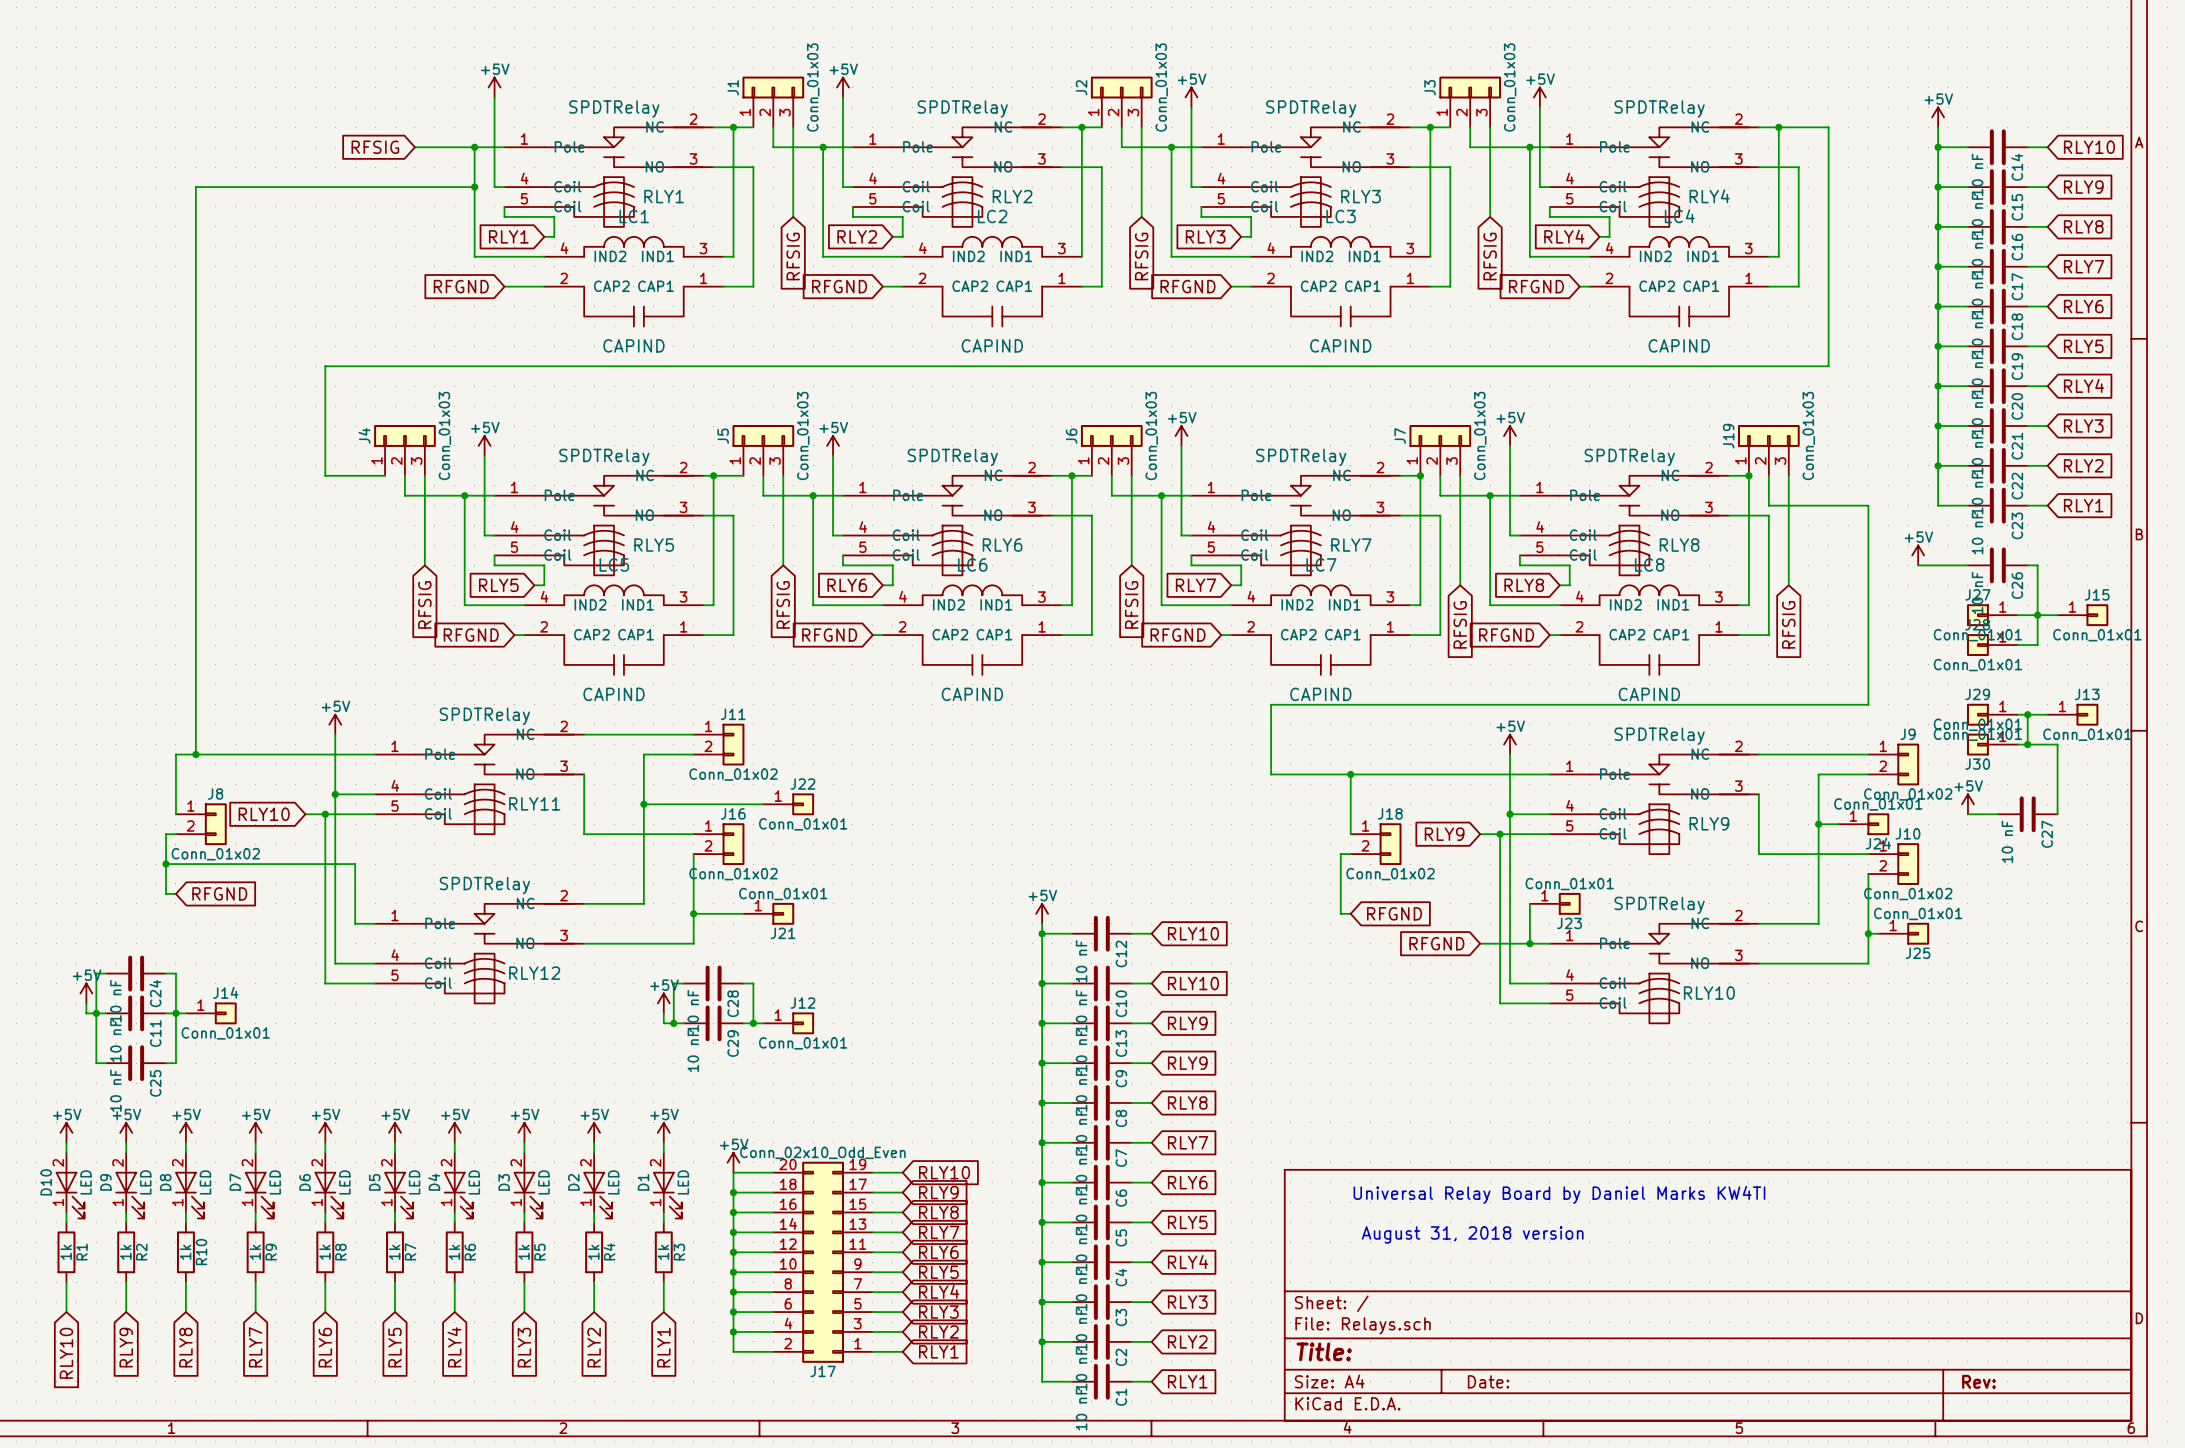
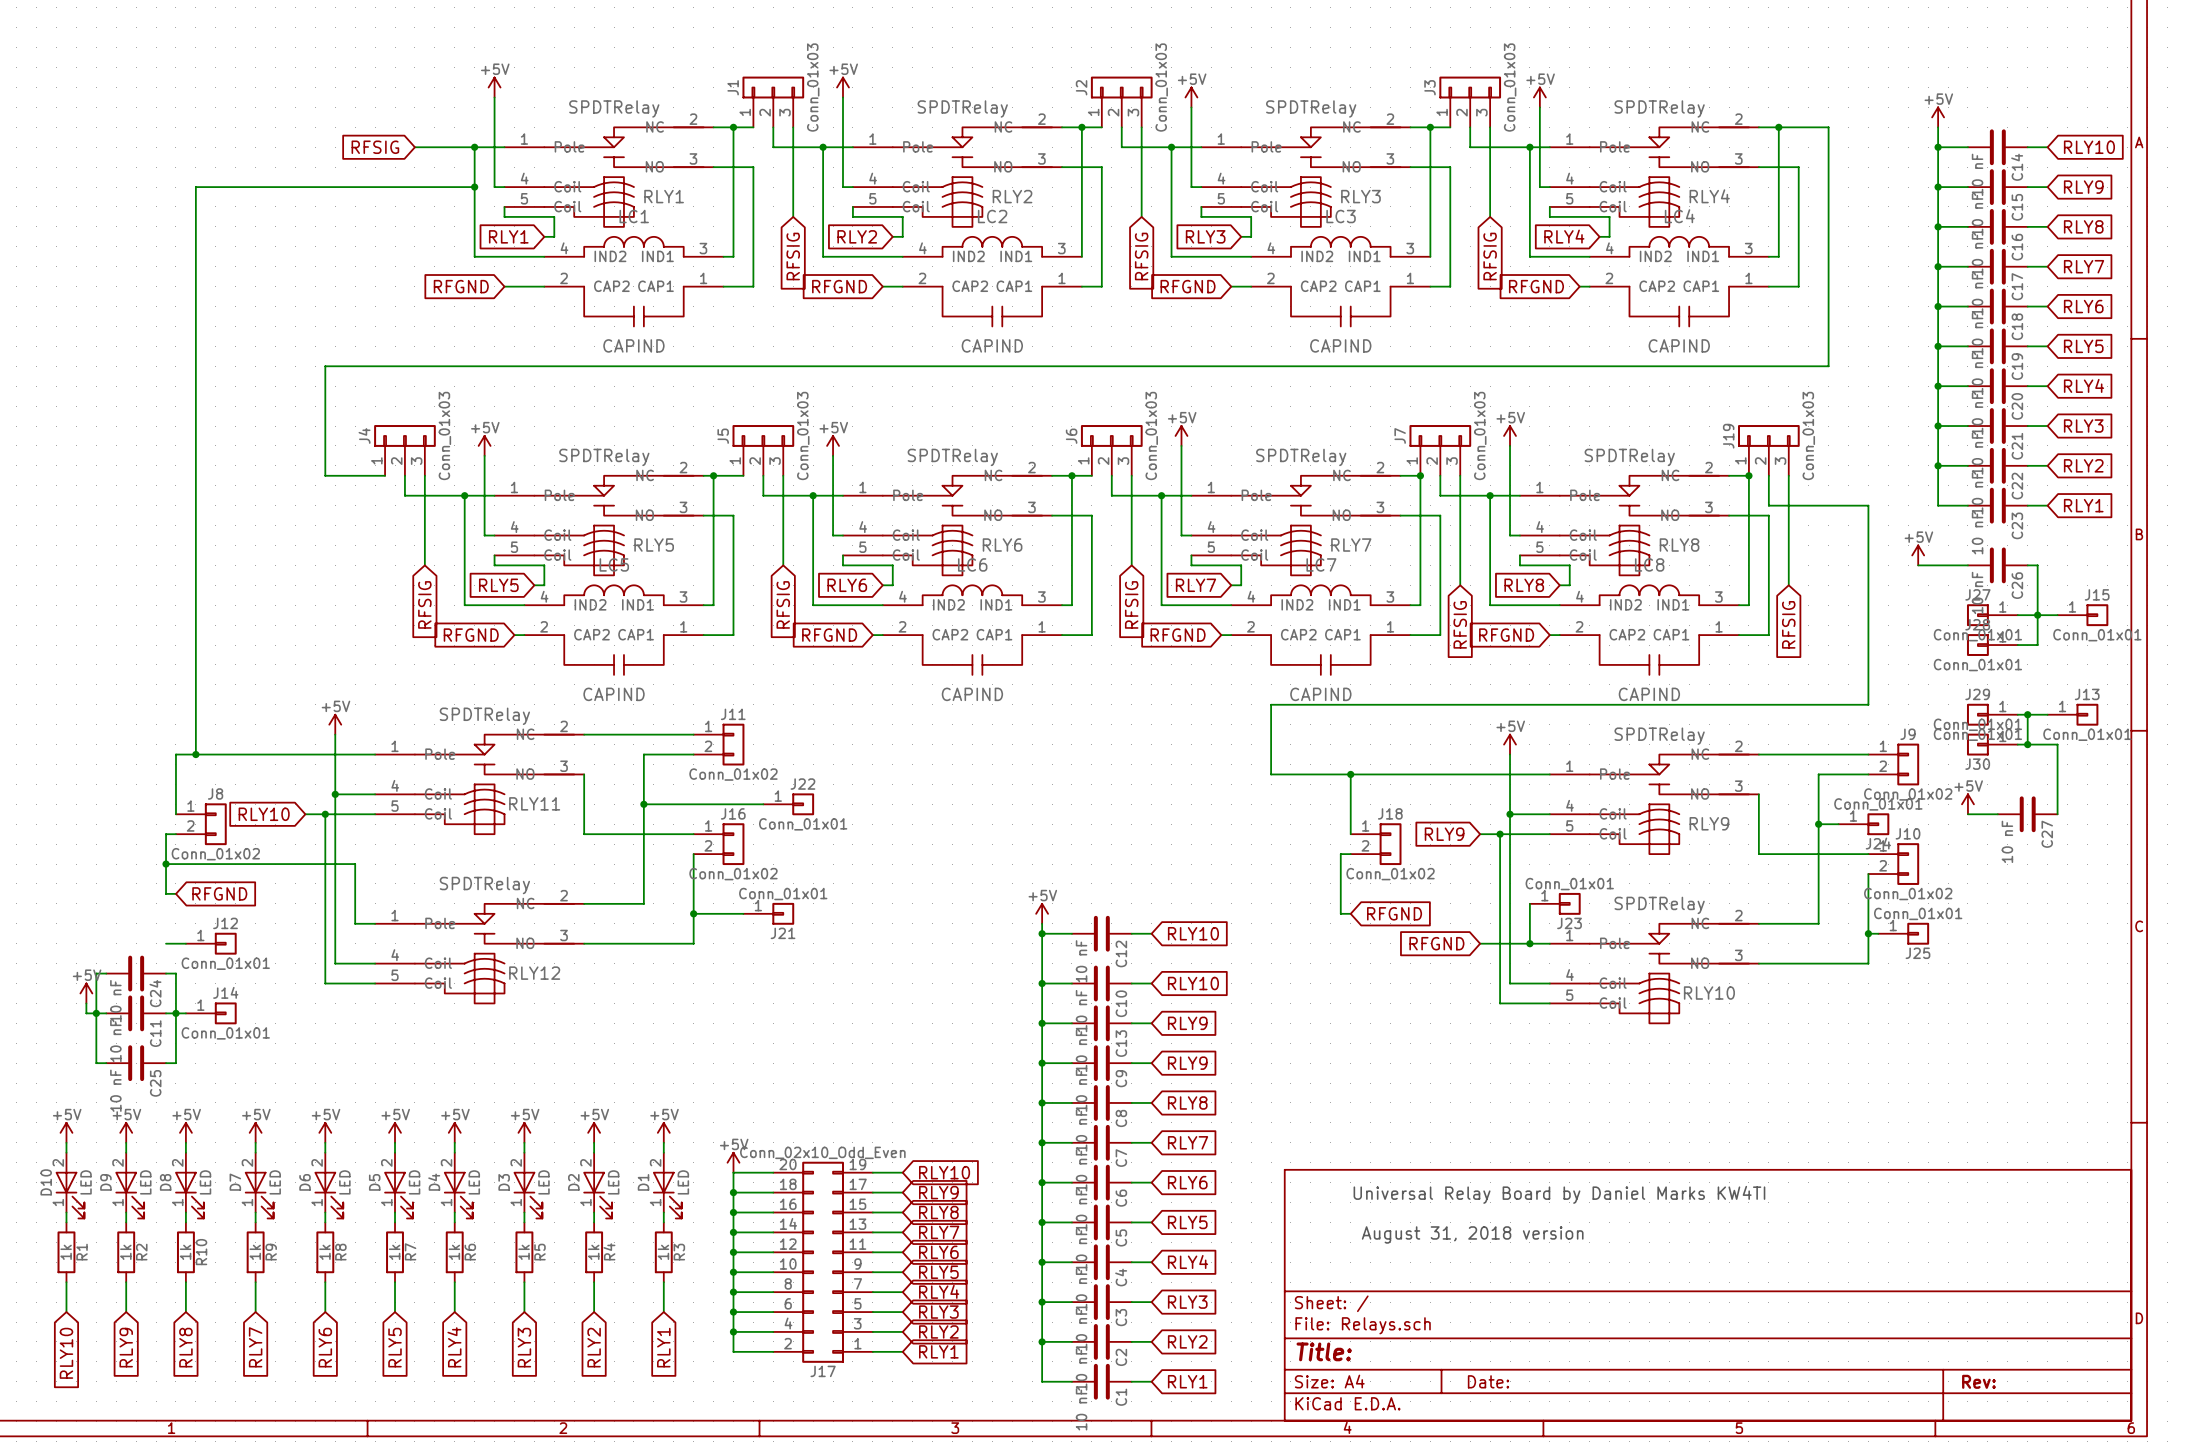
wire: none -> (166, 943) (185, 943)
wire: (683, 983) (673, 983) (673, 1023) -> none
C28: 10 nF (713, 983) -> none
wire: (743, 983) (753, 983) (753, 1023) -> none
power symbol: +5V (663, 1003) -> none
wire: (663, 1013) (663, 1023) (683, 1023) -> none
junction: (673, 1023) -> none
C29: 10 nF (713, 1023) -> none
wire: (743, 1023) (763, 1023) -> none
junction: (753, 1023) -> none
J12 position: (788, 1023) -> (211, 943)

